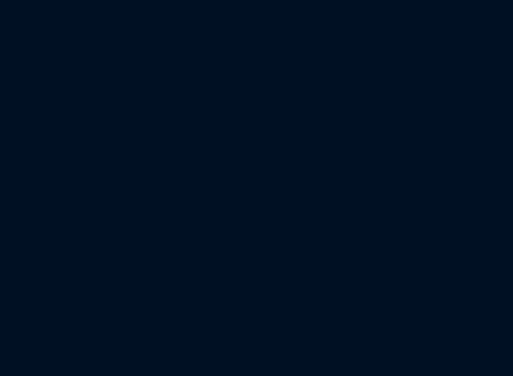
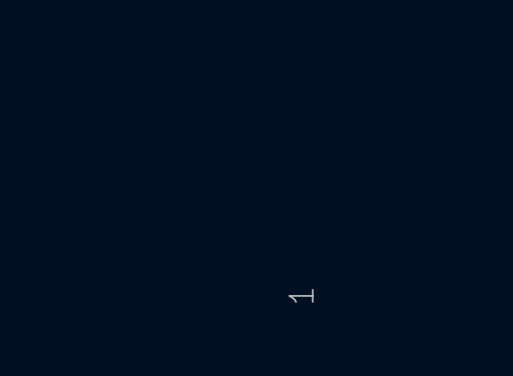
text: none -> 1 (301, 295)

